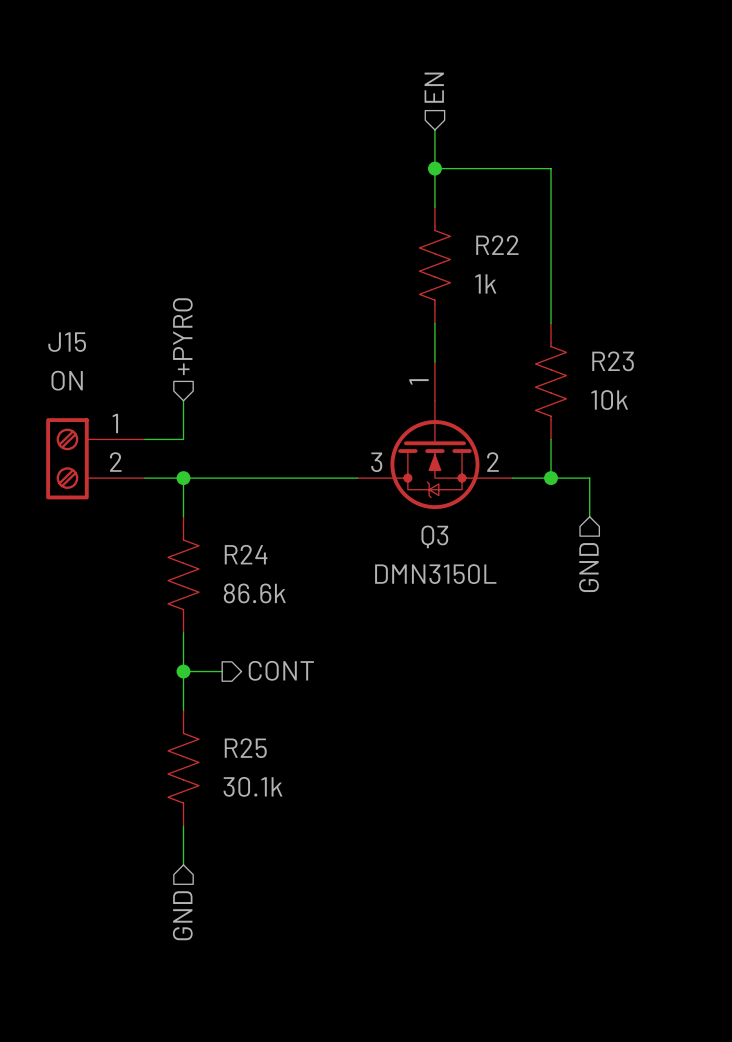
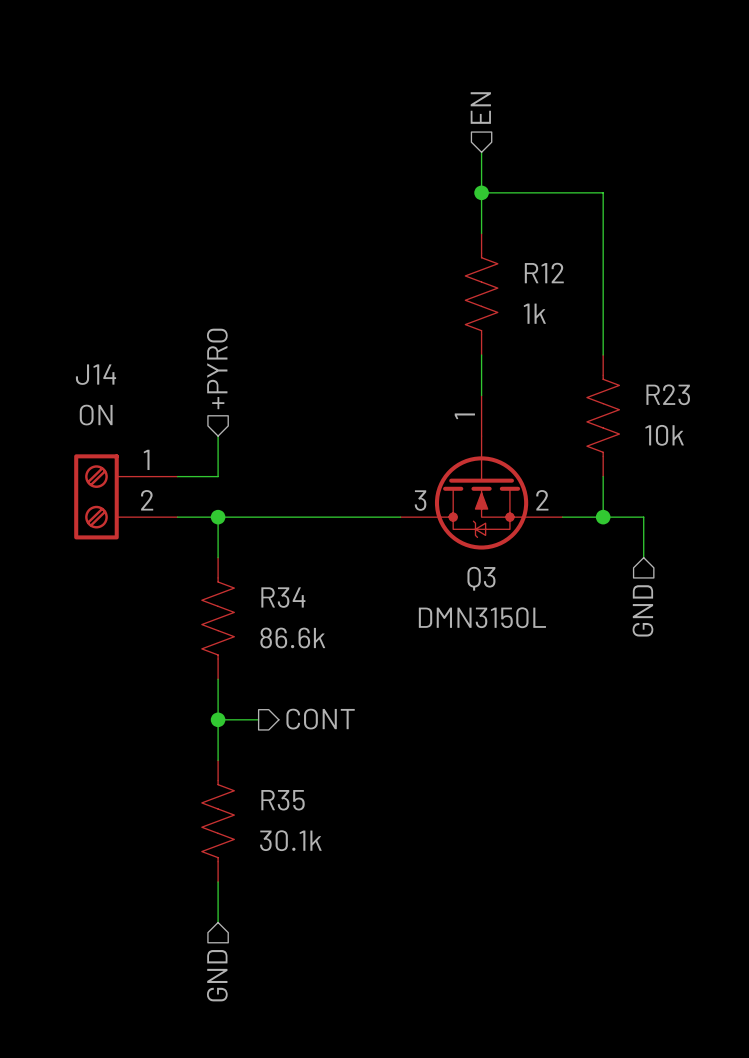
R22 name: R22 (497, 245) -> R12 (544, 273)
J15 name: J15 (67, 342) -> J14 (96, 374)
R24 name: R24 (246, 554) -> R34 (283, 597)
R25 name: R25 (245, 748) -> R35 (283, 800)

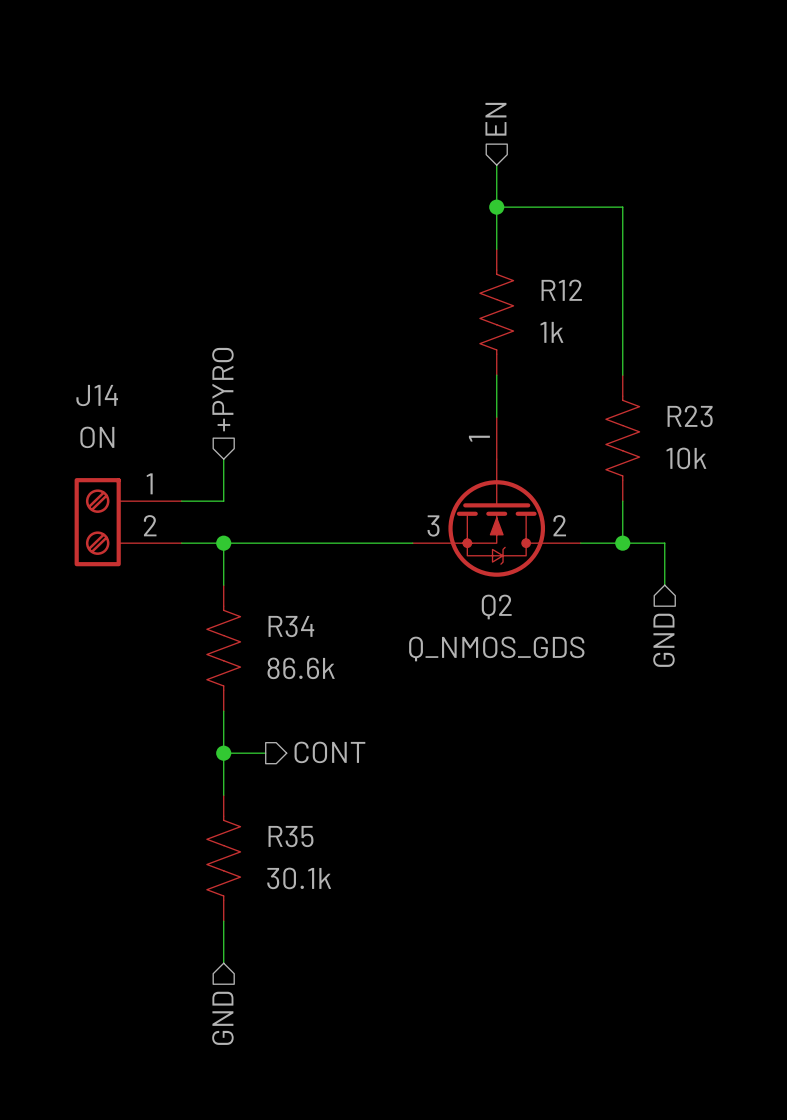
Q3: DMN3150L (481, 472) -> none
Q2: none -> Q_NMOS_GDS (496, 496)

